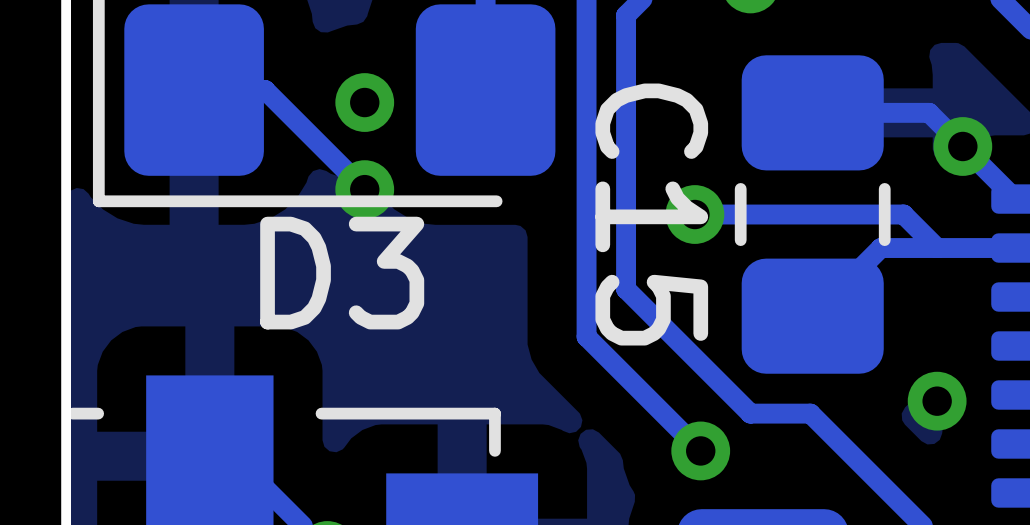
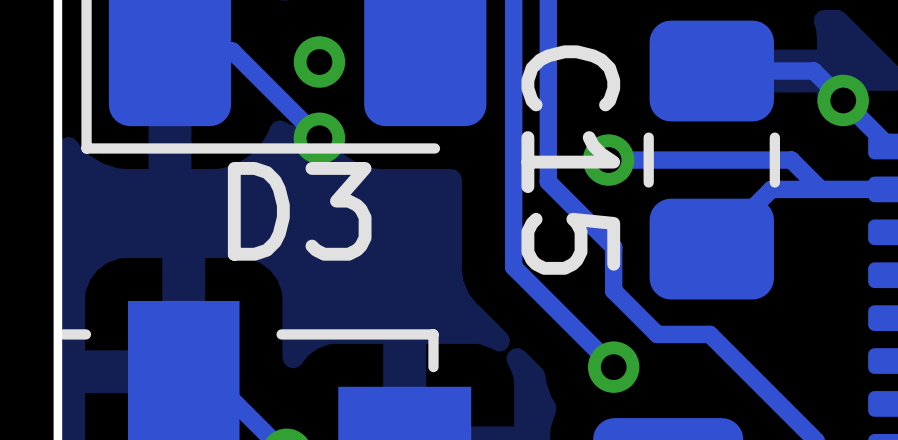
track: (626, 239) (626, 289) (700, 363) -> (548, 181) (613, 247) (613, 290)
via: (937, 401) -> none

